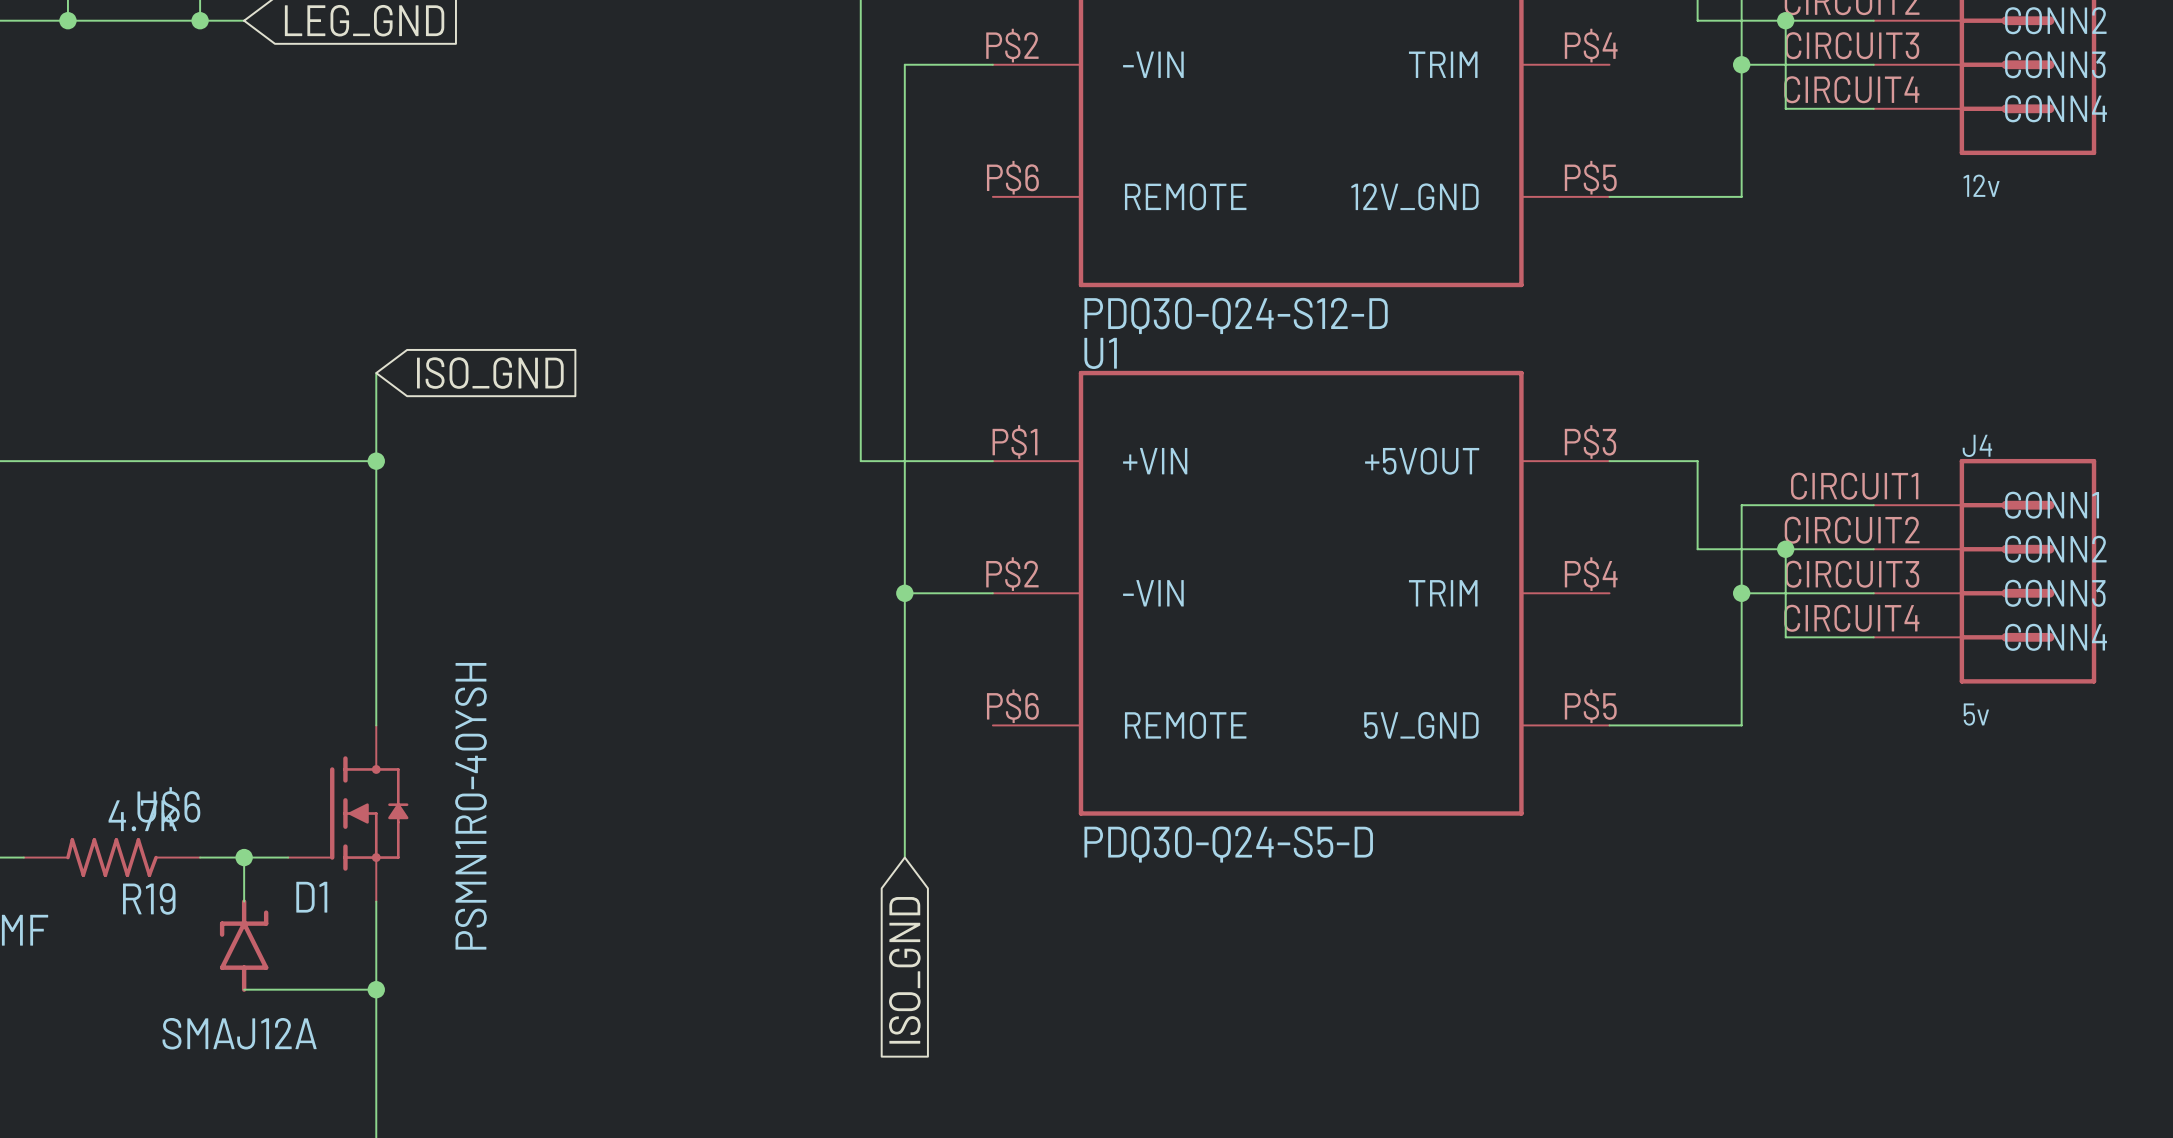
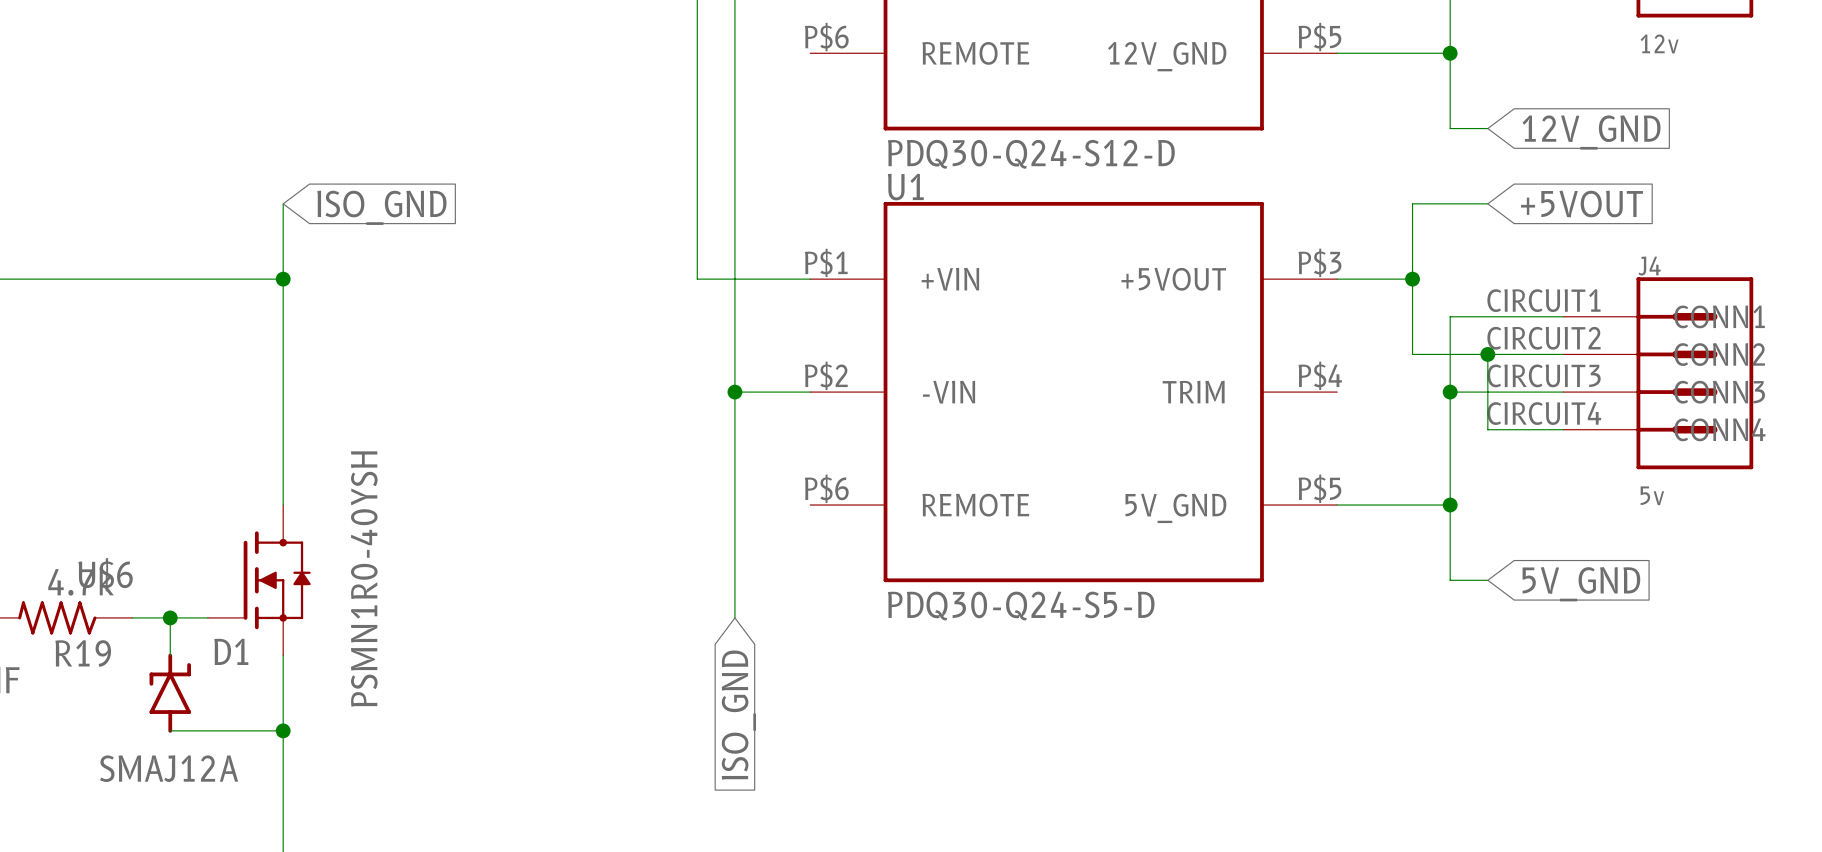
wire: none -> (1450, 53) (1450, 128) (1487, 128)
junction: none -> (1450, 53)
global label: none -> 12V_GND (1591, 132)
wire: none -> (1487, 203) (1412, 203) (1412, 279)
global label: none -> +5VOUT (1581, 204)
junction: none -> (1412, 279)
wire: none -> (1450, 505) (1450, 580) (1487, 580)
junction: none -> (1450, 505)
global label: none -> 5V_GND (1581, 584)

